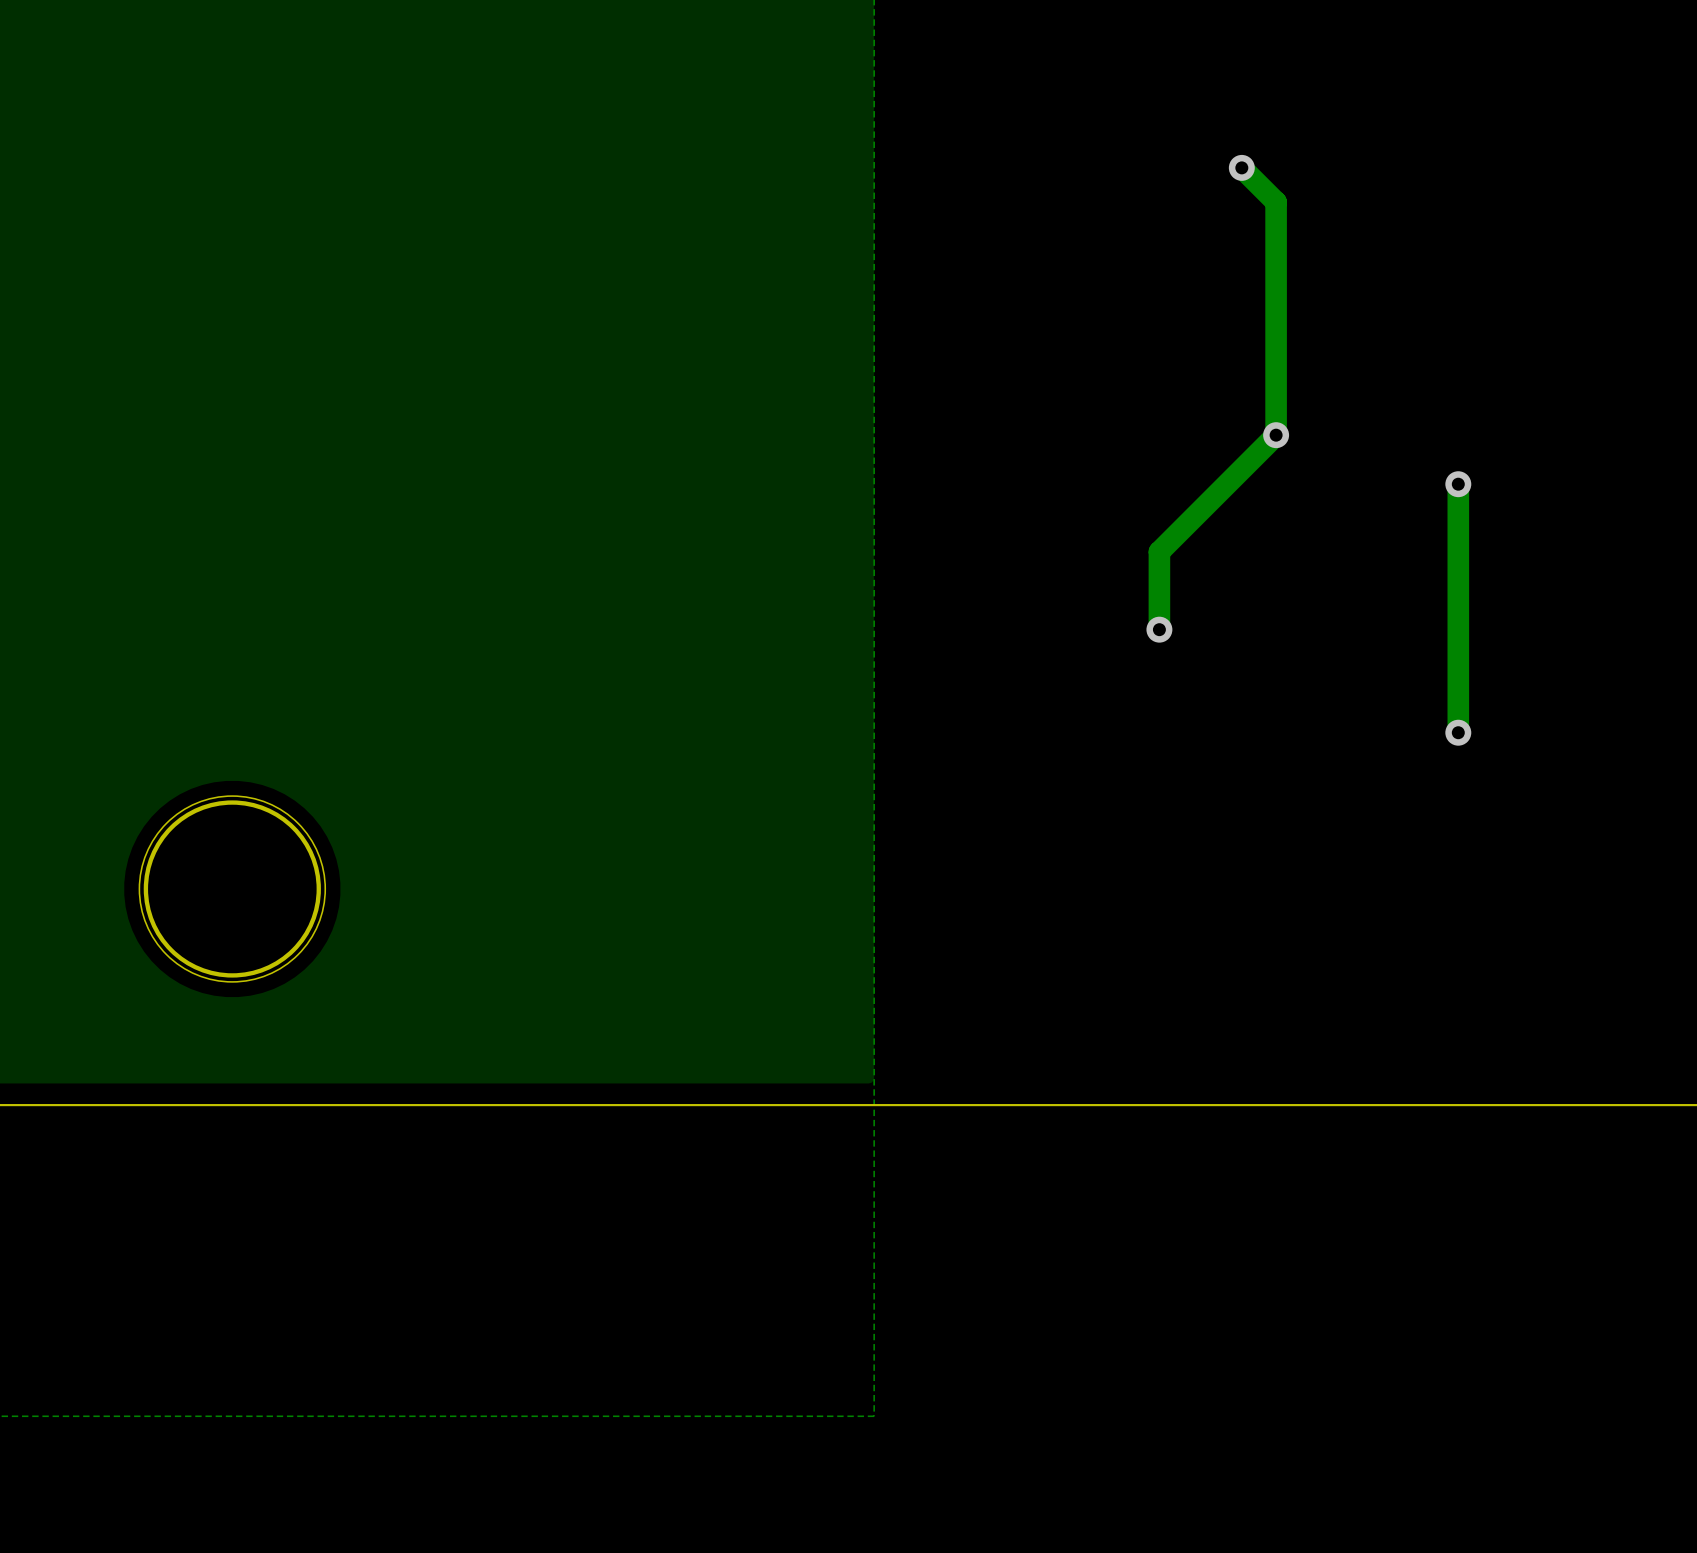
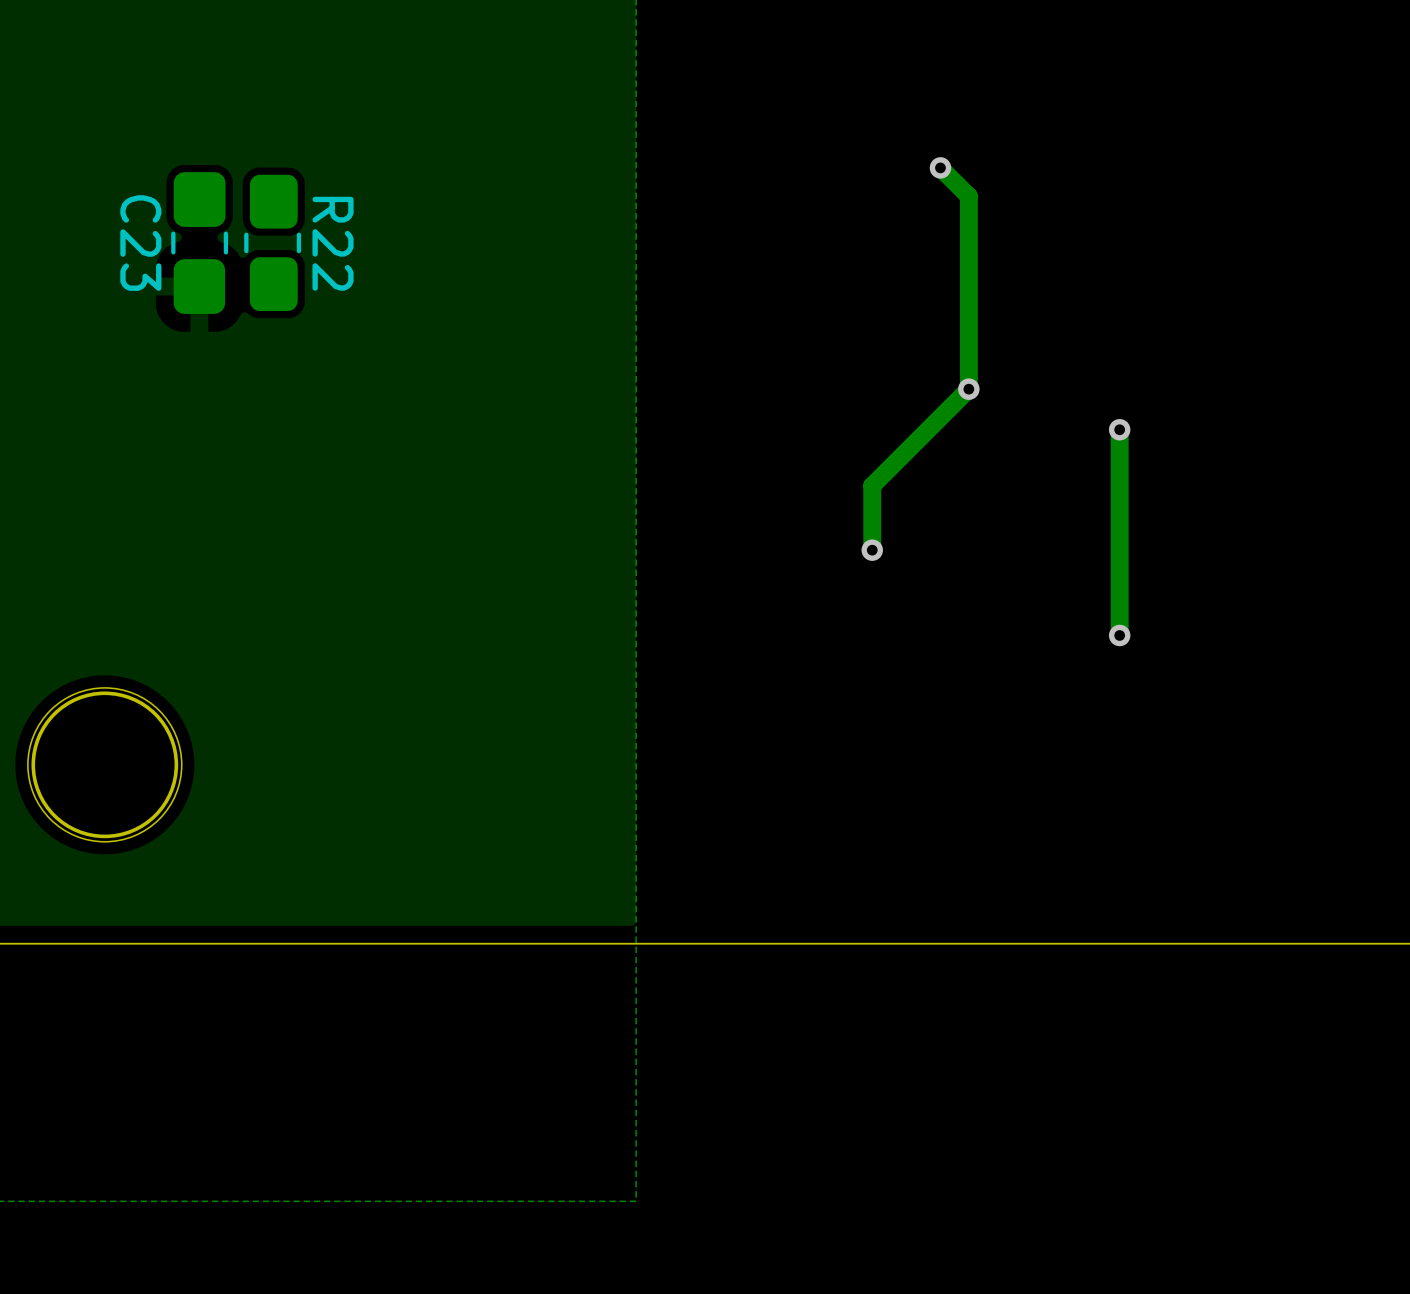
C23: none -> (199, 243)
R22: none -> (272, 242)

